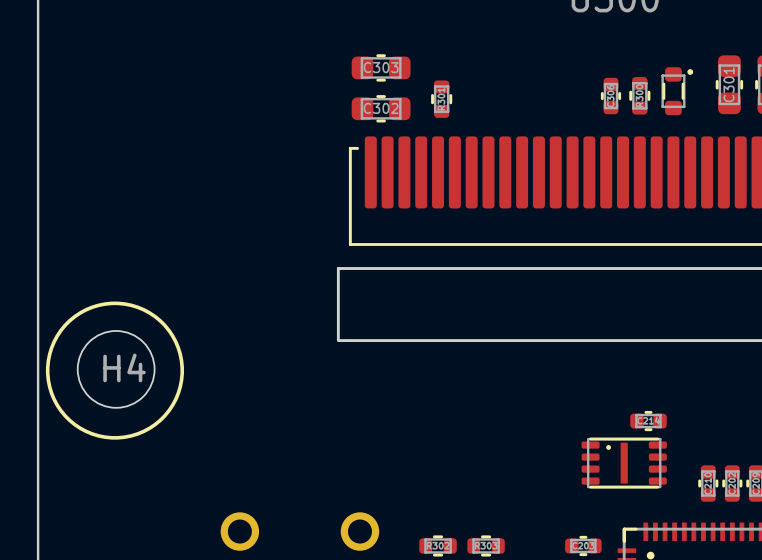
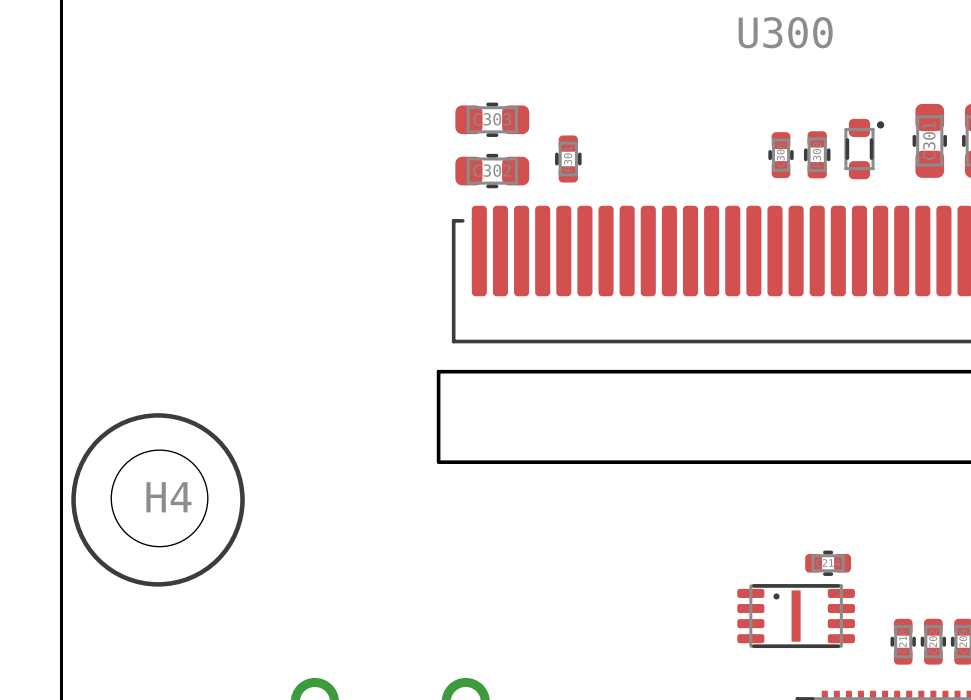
part footprint: [581, 437, 667, 489] -> [737, 584, 855, 649]

